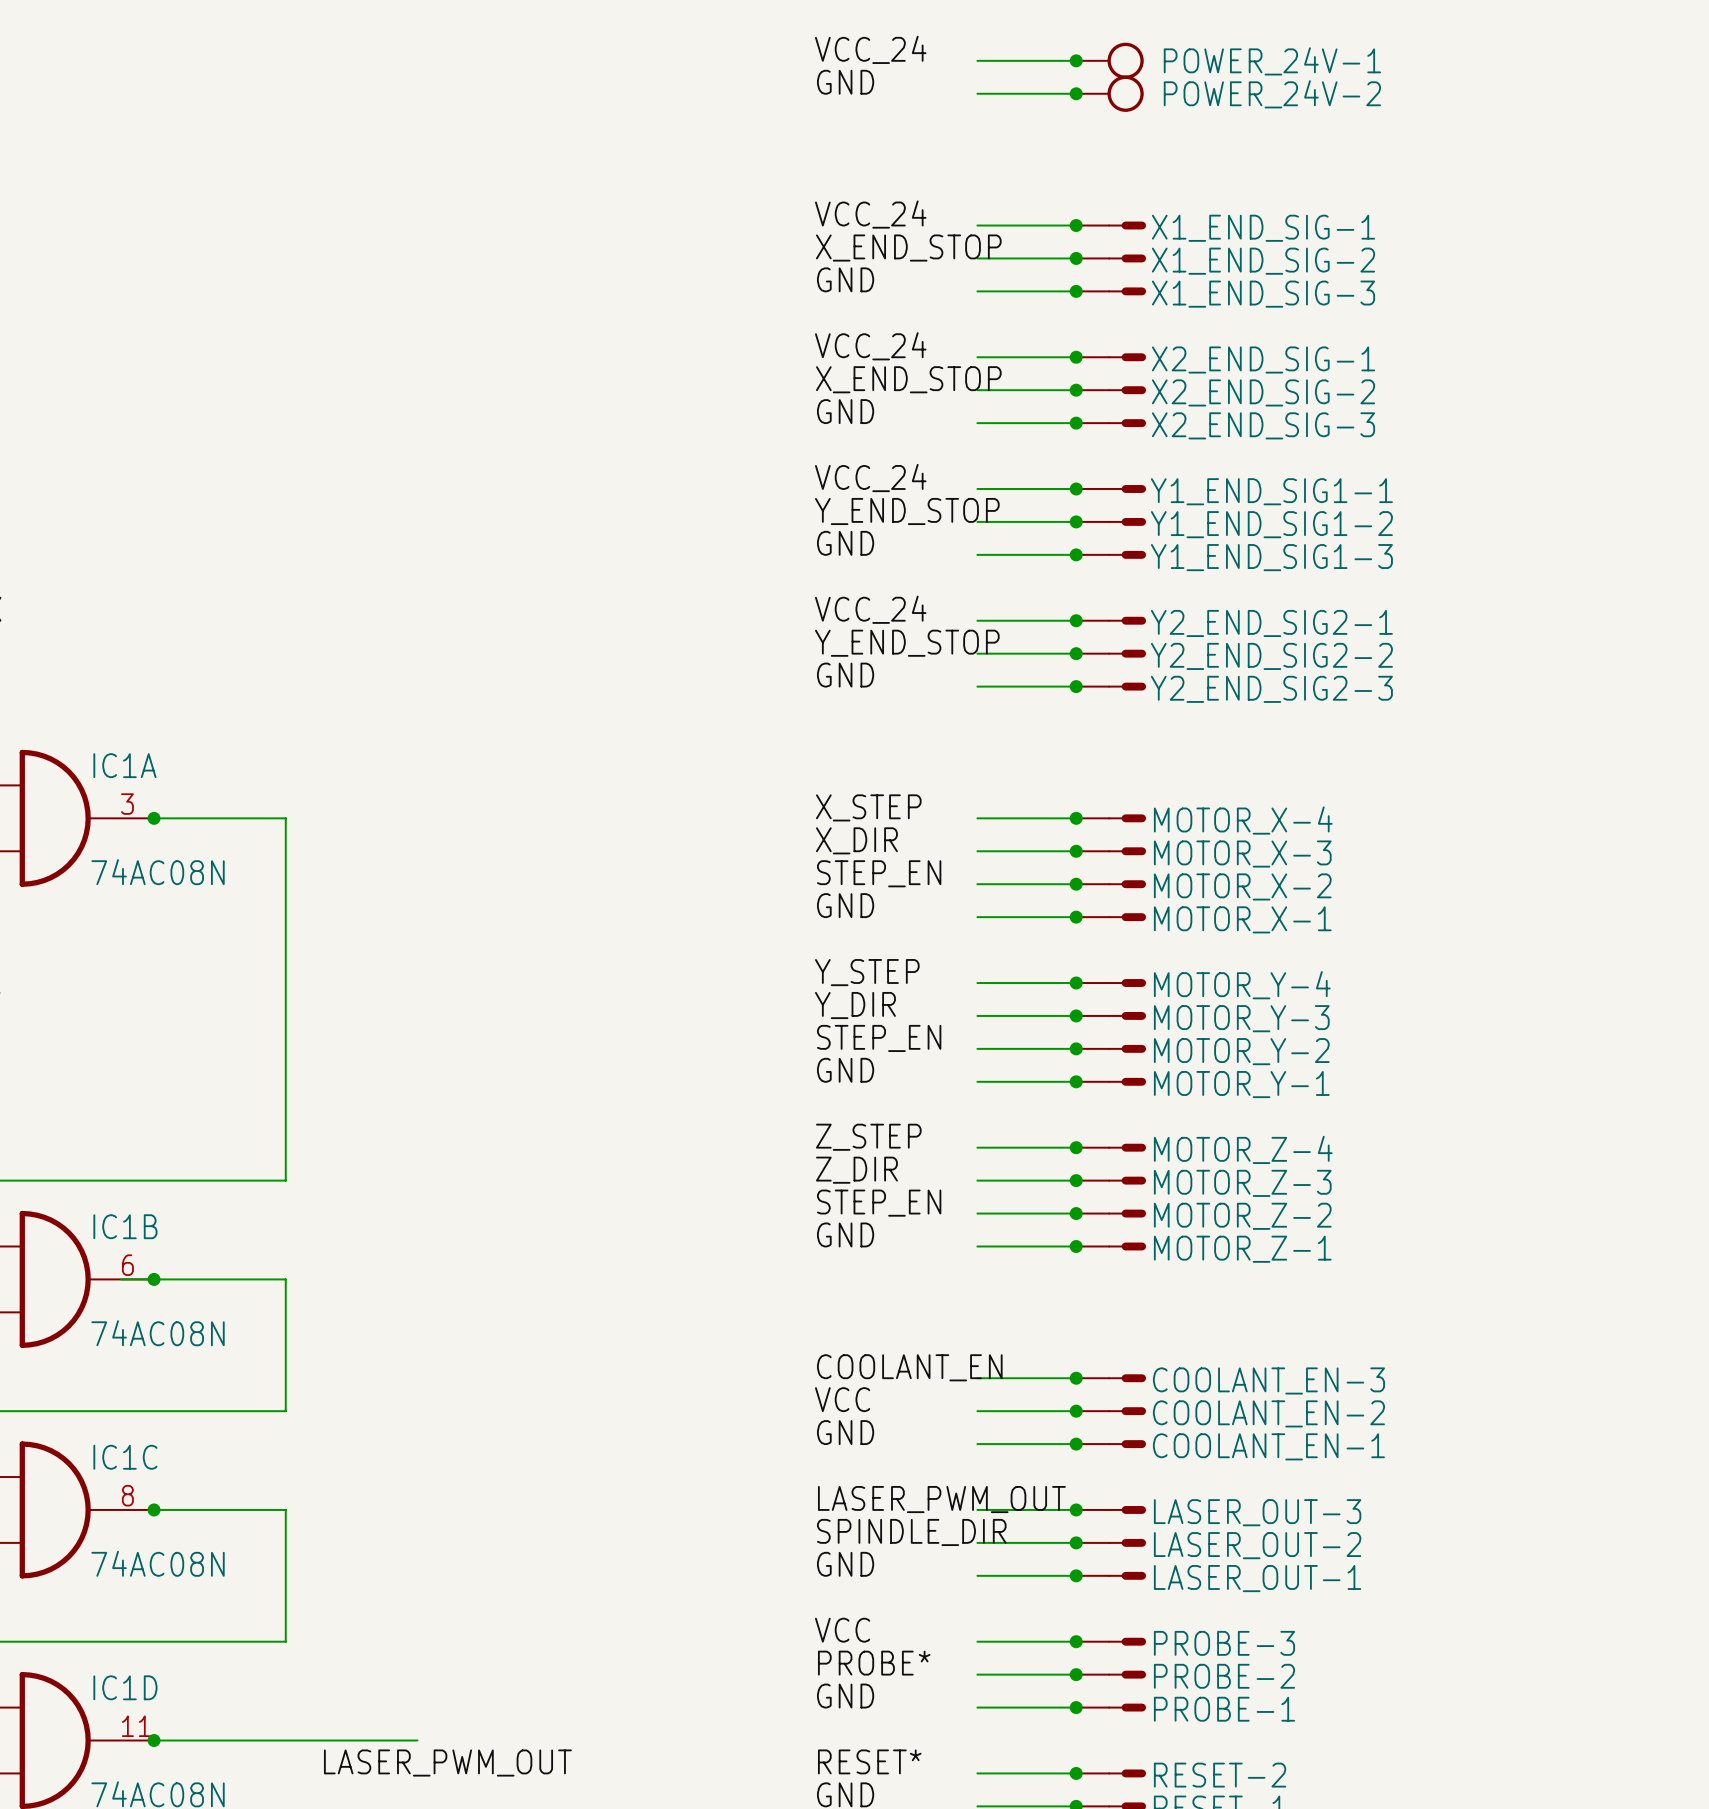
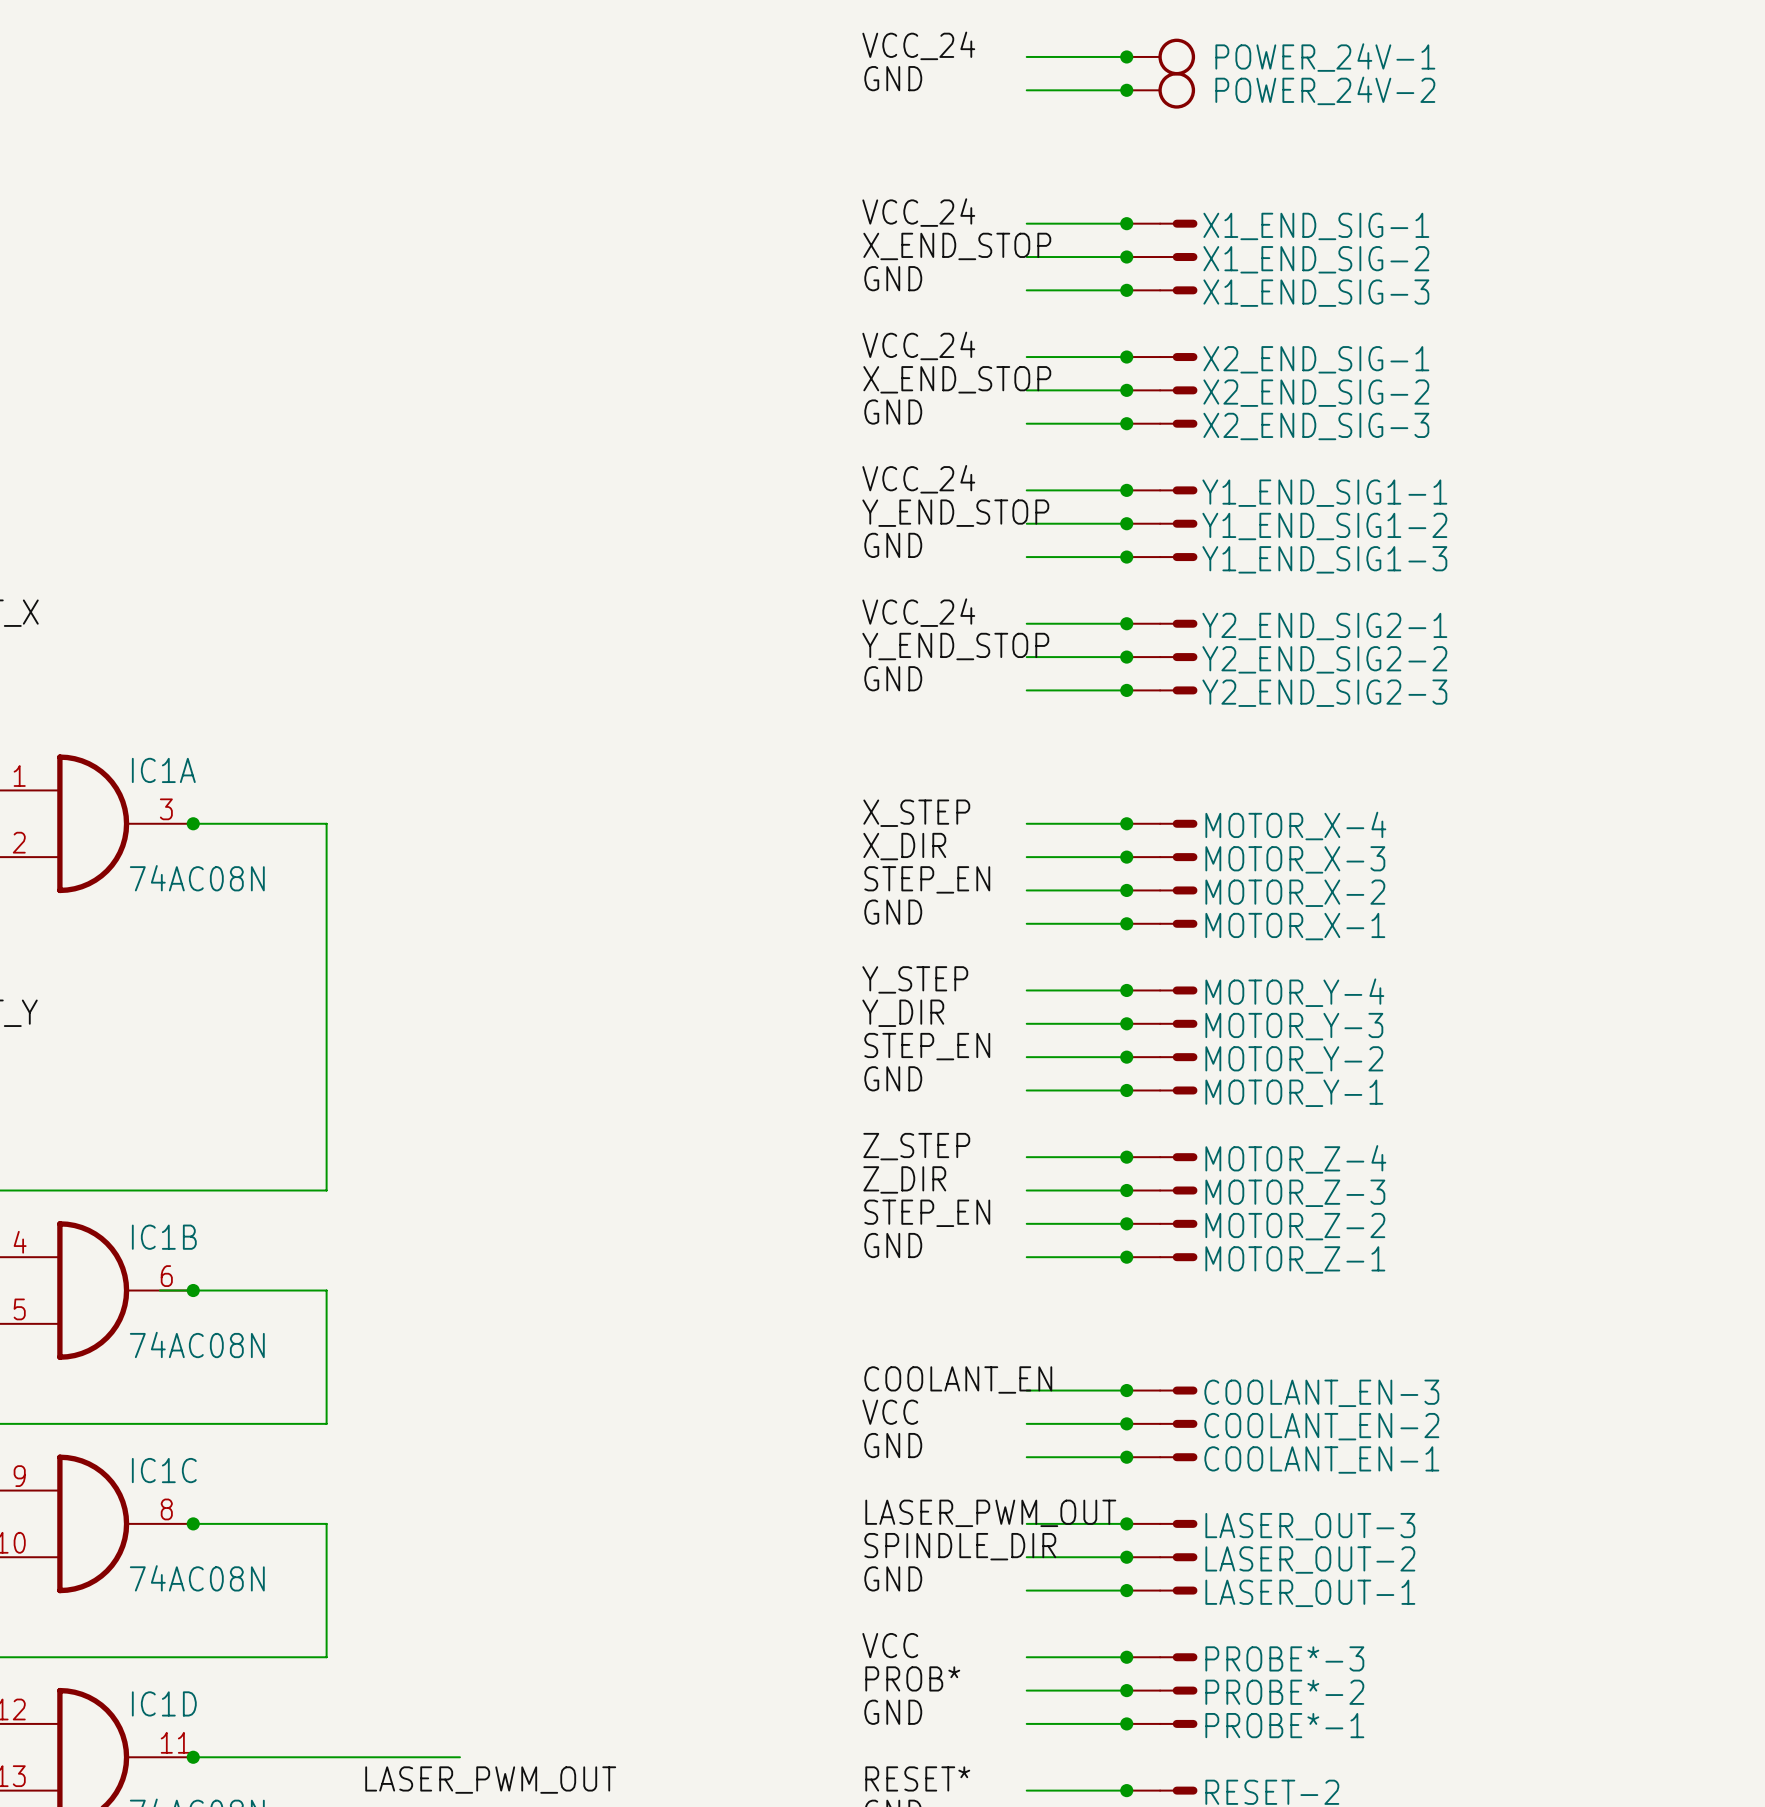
PROBE-3 name: PROBE-3 (1224, 1643) -> PROBE*-3 (1284, 1658)
label: PROBE* (874, 1663) -> PROB* (912, 1678)
PROBE-2 name: PROBE-2 (1224, 1676) -> PROBE*-2 (1284, 1692)
PROBE-1 name: PROBE-1 (1224, 1709) -> PROBE*-1 (1284, 1725)

